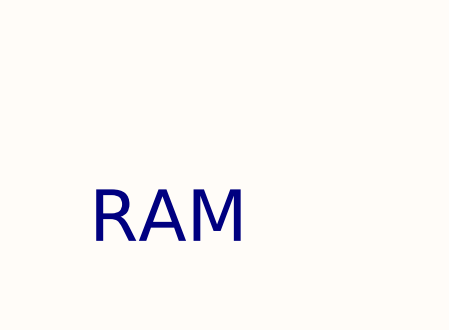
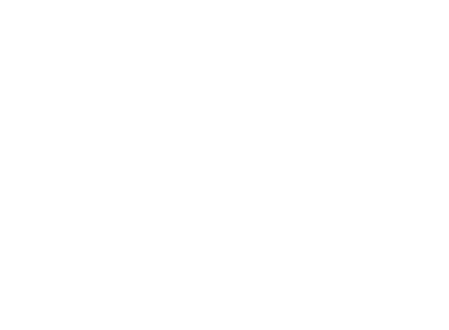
text: RAM (168, 215) -> none

